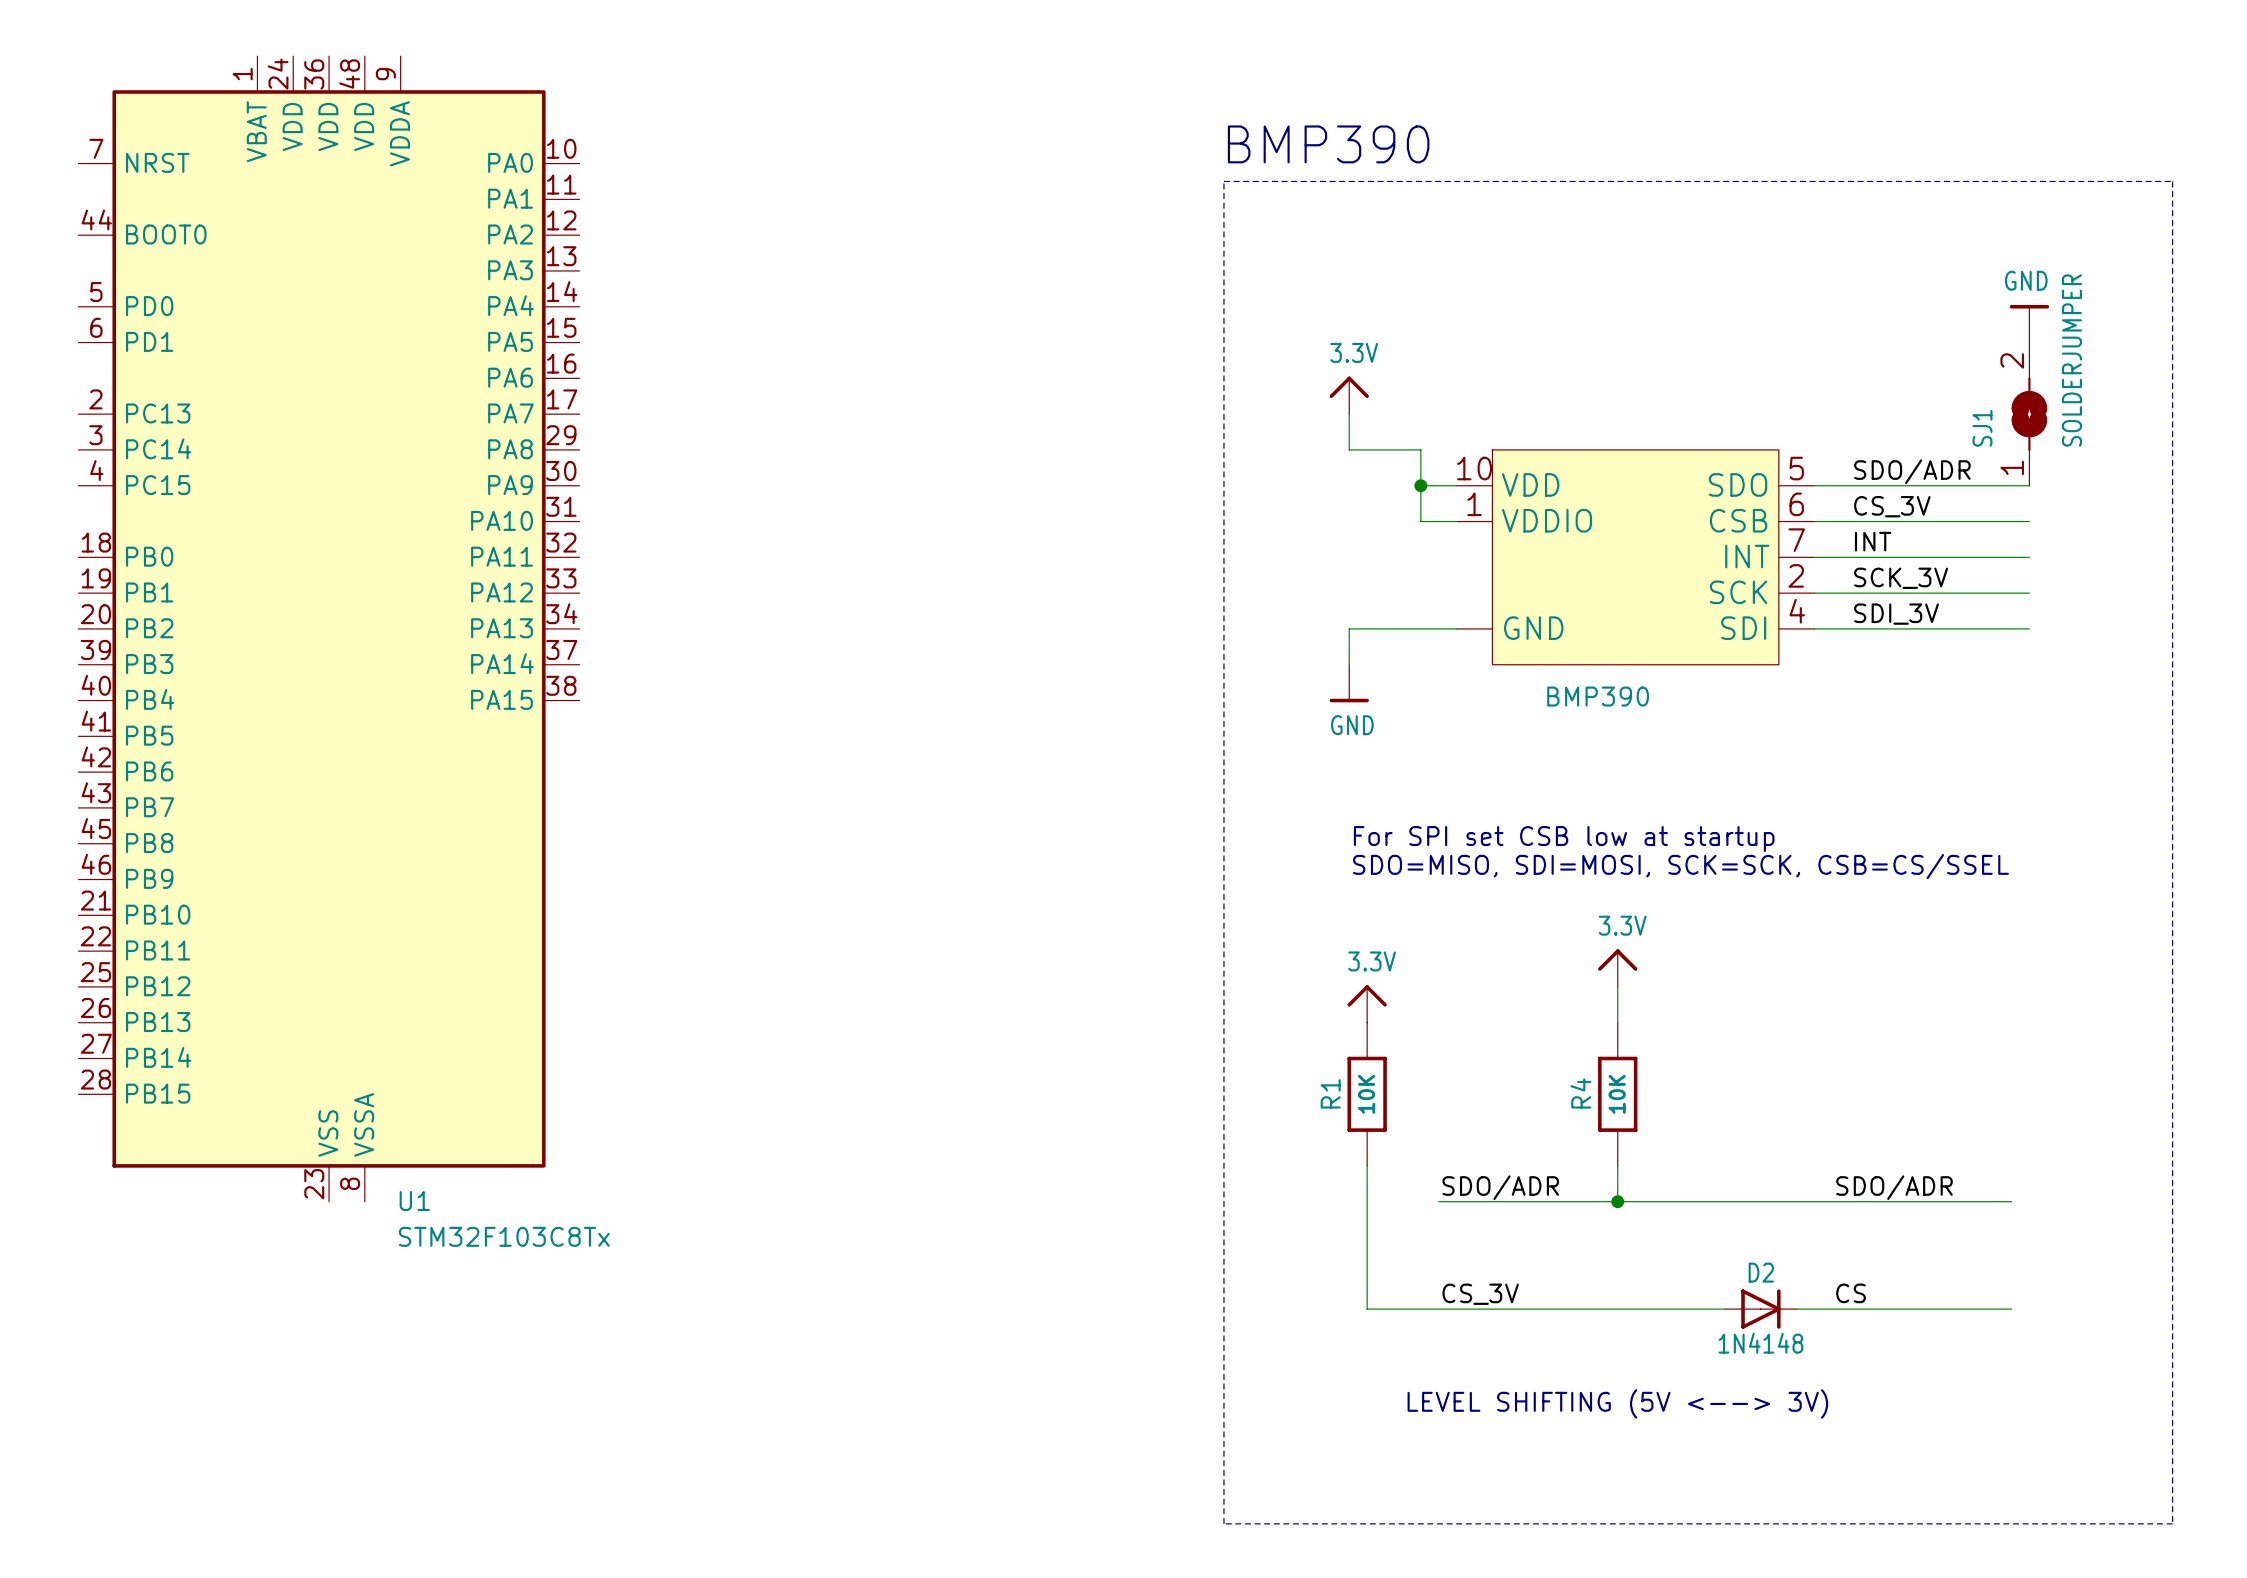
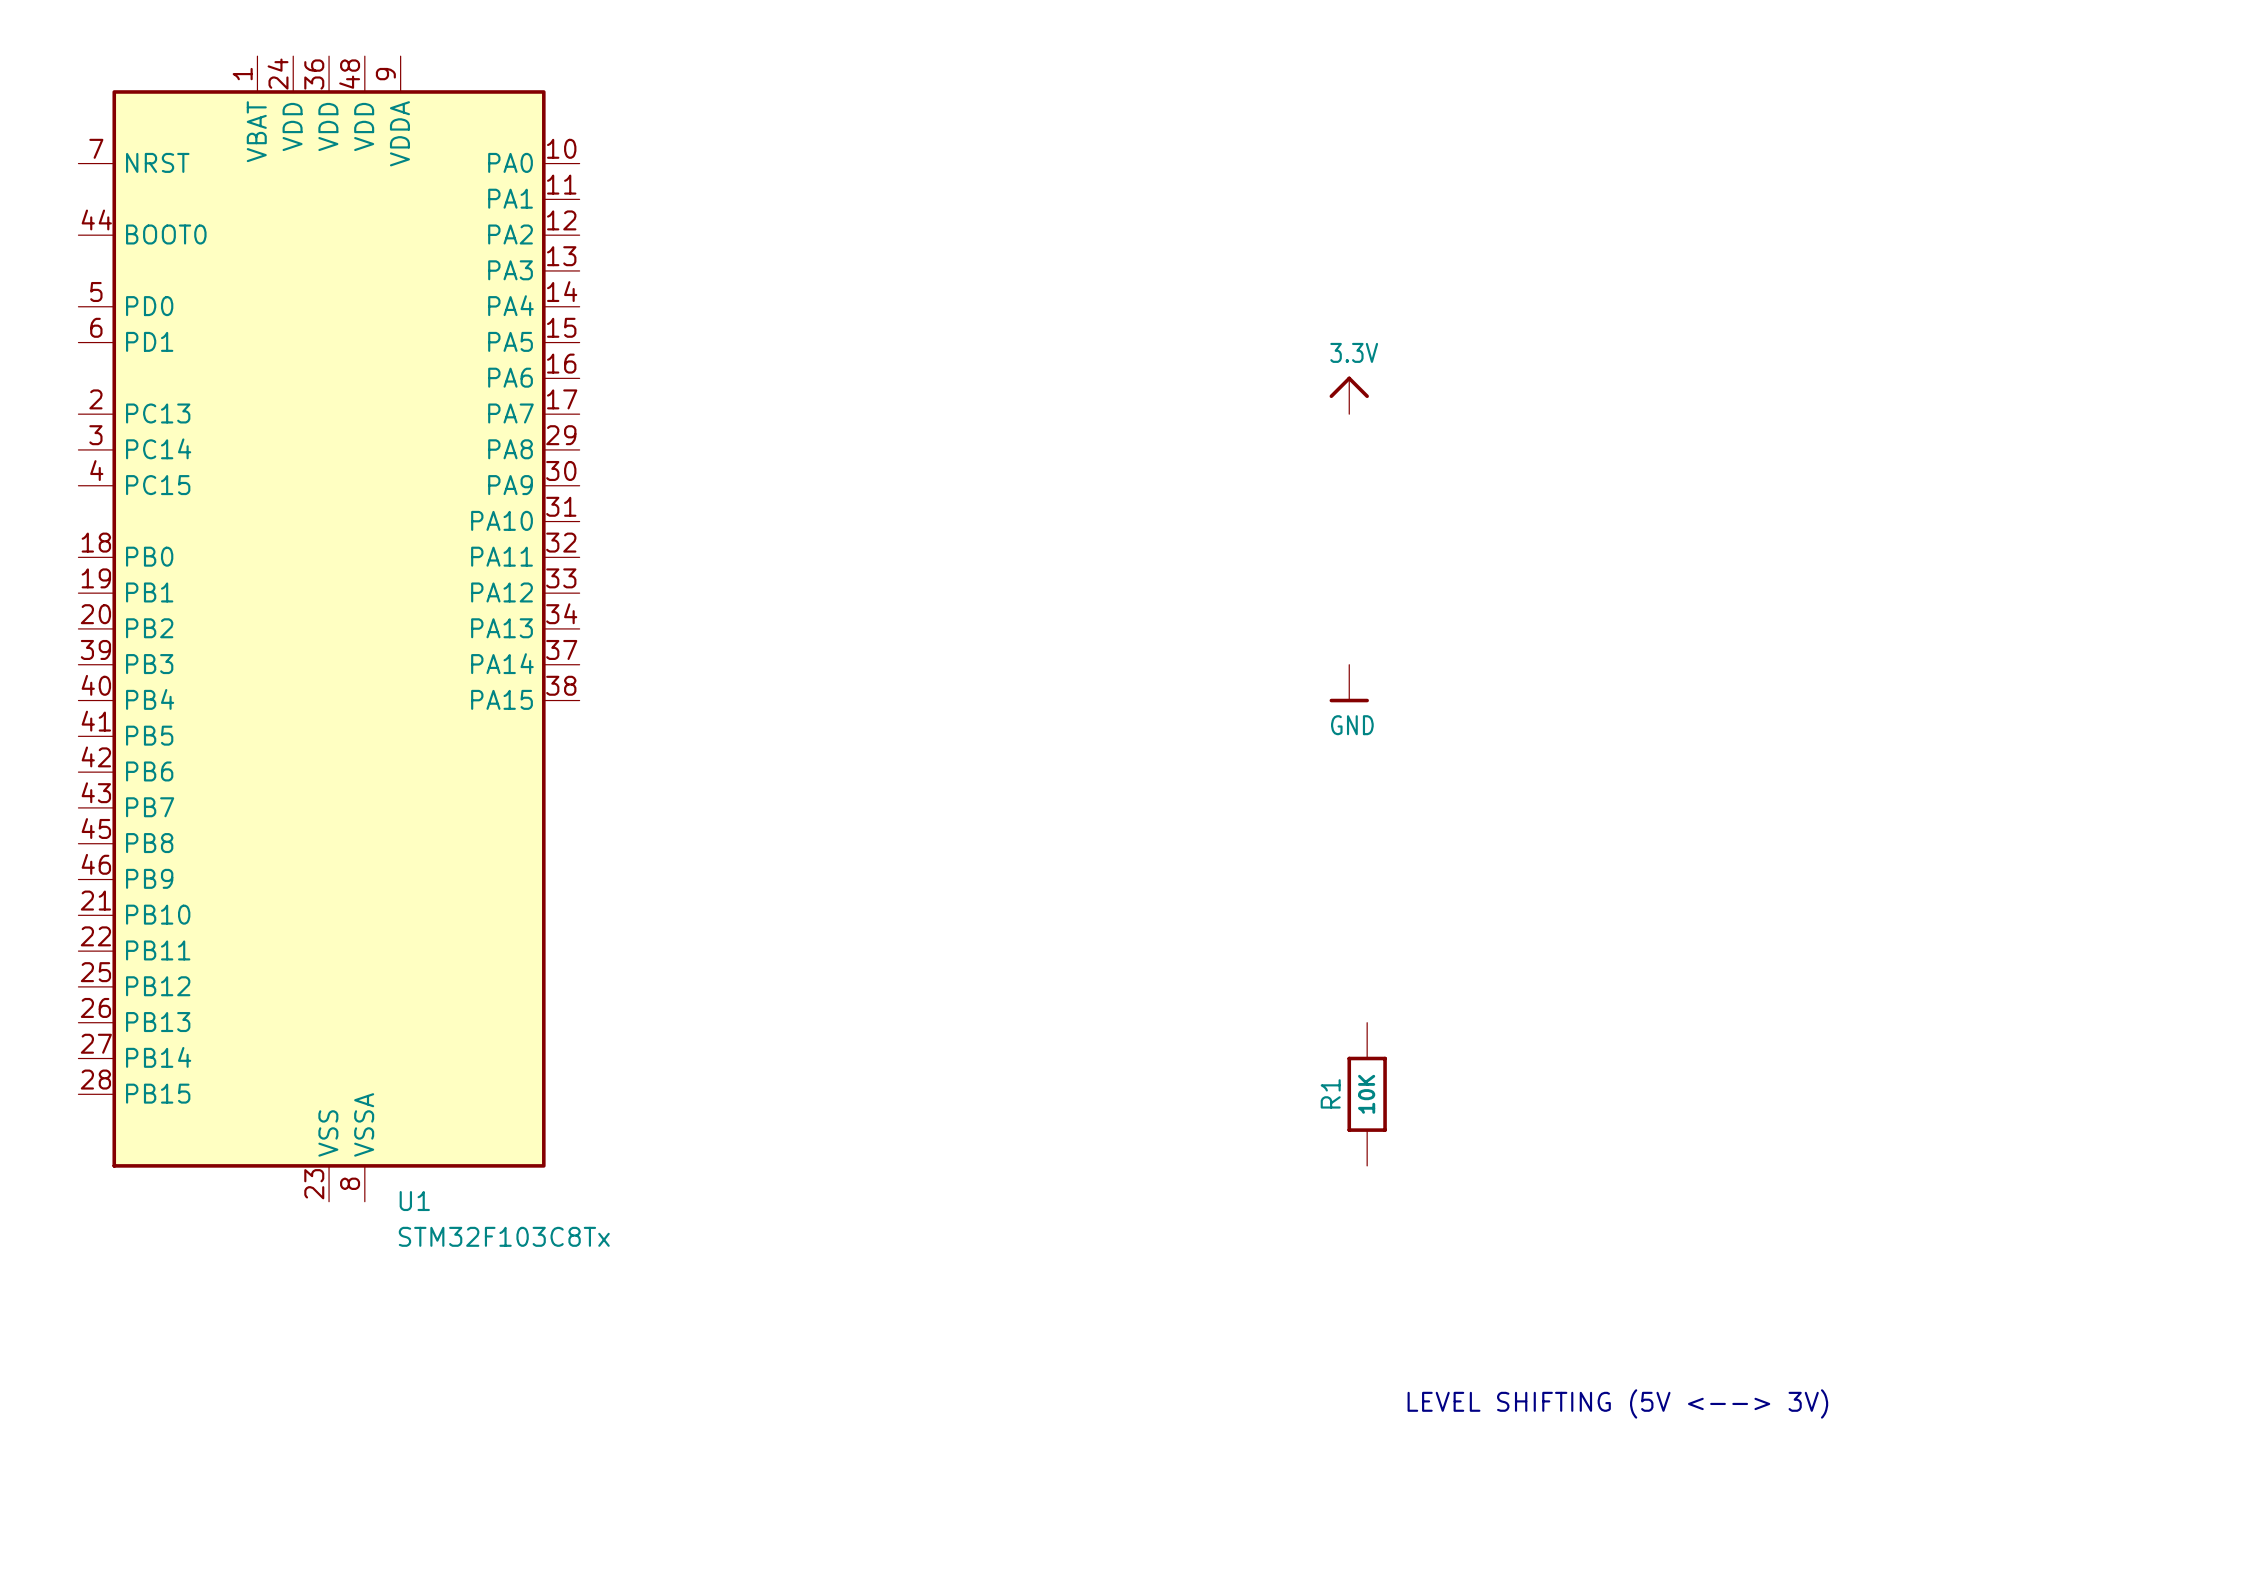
text: BMP390 (1328, 144) -> none
line: (1223, 181) (2172, 181) (2172, 1523) (1223, 1523) (1223, 181) -> none
power symbol: GND (2029, 323) -> none
wire: (1349, 414) (1349, 449) (1420, 449) (1420, 521) (1456, 521) -> none
SJ1: SOLDERJUMPER (2029, 414) -> none
label: SDO/ADR (1912, 471) -> none
wire: (1420, 485) (1456, 485) -> none
junction: (1420, 485) -> none
wire: (1814, 485) (2029, 485) -> none
label: CS_3V (1892, 506) -> none
wire: (1814, 521) (2029, 521) -> none
label: INT (1873, 541) -> none
part: BMP390 (1635, 557) -> none
wire: (1814, 557) (2029, 557) -> none
label: SCK_3V (1901, 578) -> none
wire: (1814, 593) (2029, 593) -> none
label: SDI_3V (1896, 614) -> none
wire: (1456, 628) (1349, 628) (1349, 664) -> none
wire: (1814, 628) (2029, 628) -> none
text: For SPI set CSB low at startup (1564, 839) -> none
text: SDO=MISO, SDI=MOSI, SCK=SCK, CSB=CS/SSEL (1680, 866) -> none
power symbol: 3.3V (1617, 968) -> none
wire: (1617, 986) (1617, 1022) -> none
power symbol: 3.3V (1367, 1003) -> none
R4: 10K (1617, 1094) -> none
wire: (1367, 1165) (1367, 1309) (1725, 1309) -> none
wire: (1617, 1165) (1617, 1201) -> none
label: SDO/ADR (1500, 1187) -> none
label: SDO/ADR (1894, 1187) -> none
wire: (1438, 1201) (2011, 1201) -> none
junction: (1617, 1201) -> none
label: CS (1851, 1293) -> none
label: CS_3V (1480, 1294) -> none
D2: 1N4148 (1760, 1309) -> none
wire: (1796, 1309) (2011, 1309) -> none

